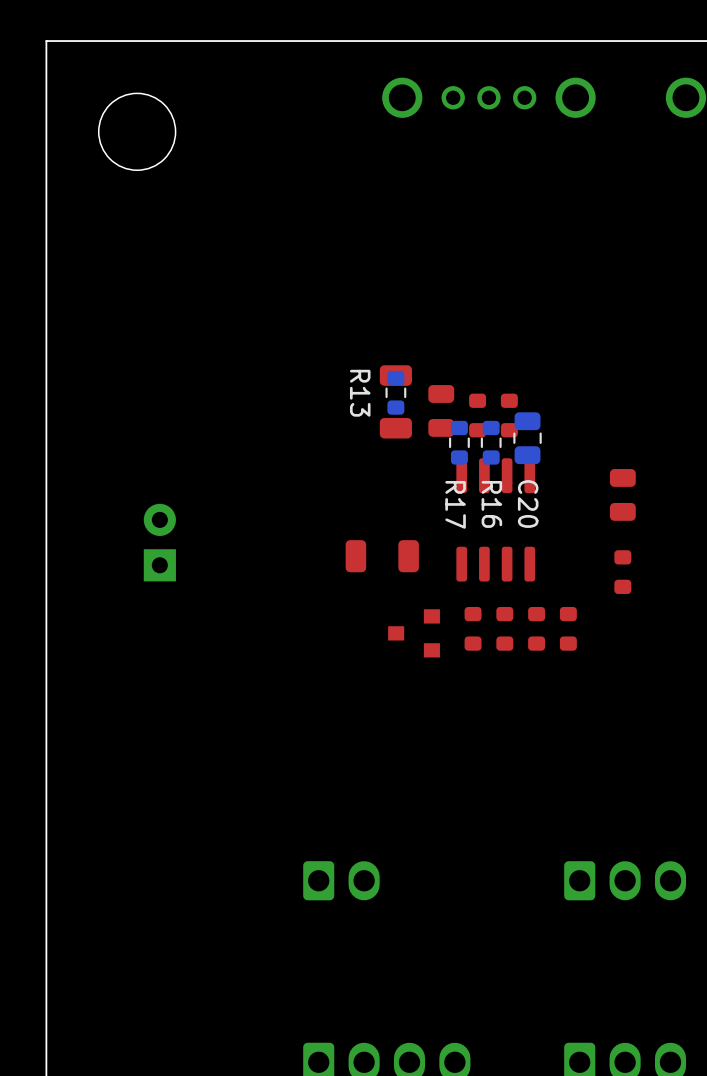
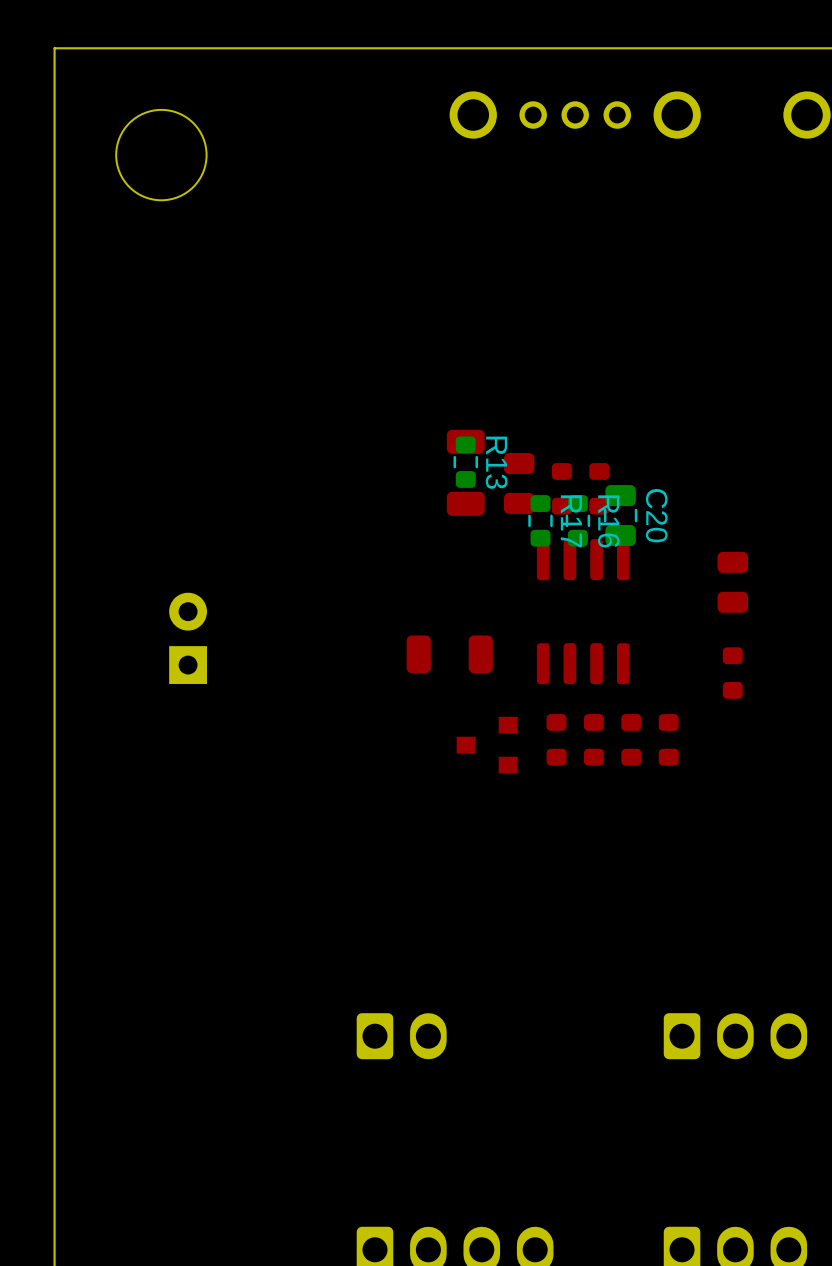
R13 name position: R13 (360, 393) -> R13 (496, 462)
R17 name position: R17 (455, 504) -> R17 (571, 521)
R16 name position: R16 (491, 504) -> R16 (608, 521)
C20 name position: C20 (528, 504) -> C20 (656, 515)

